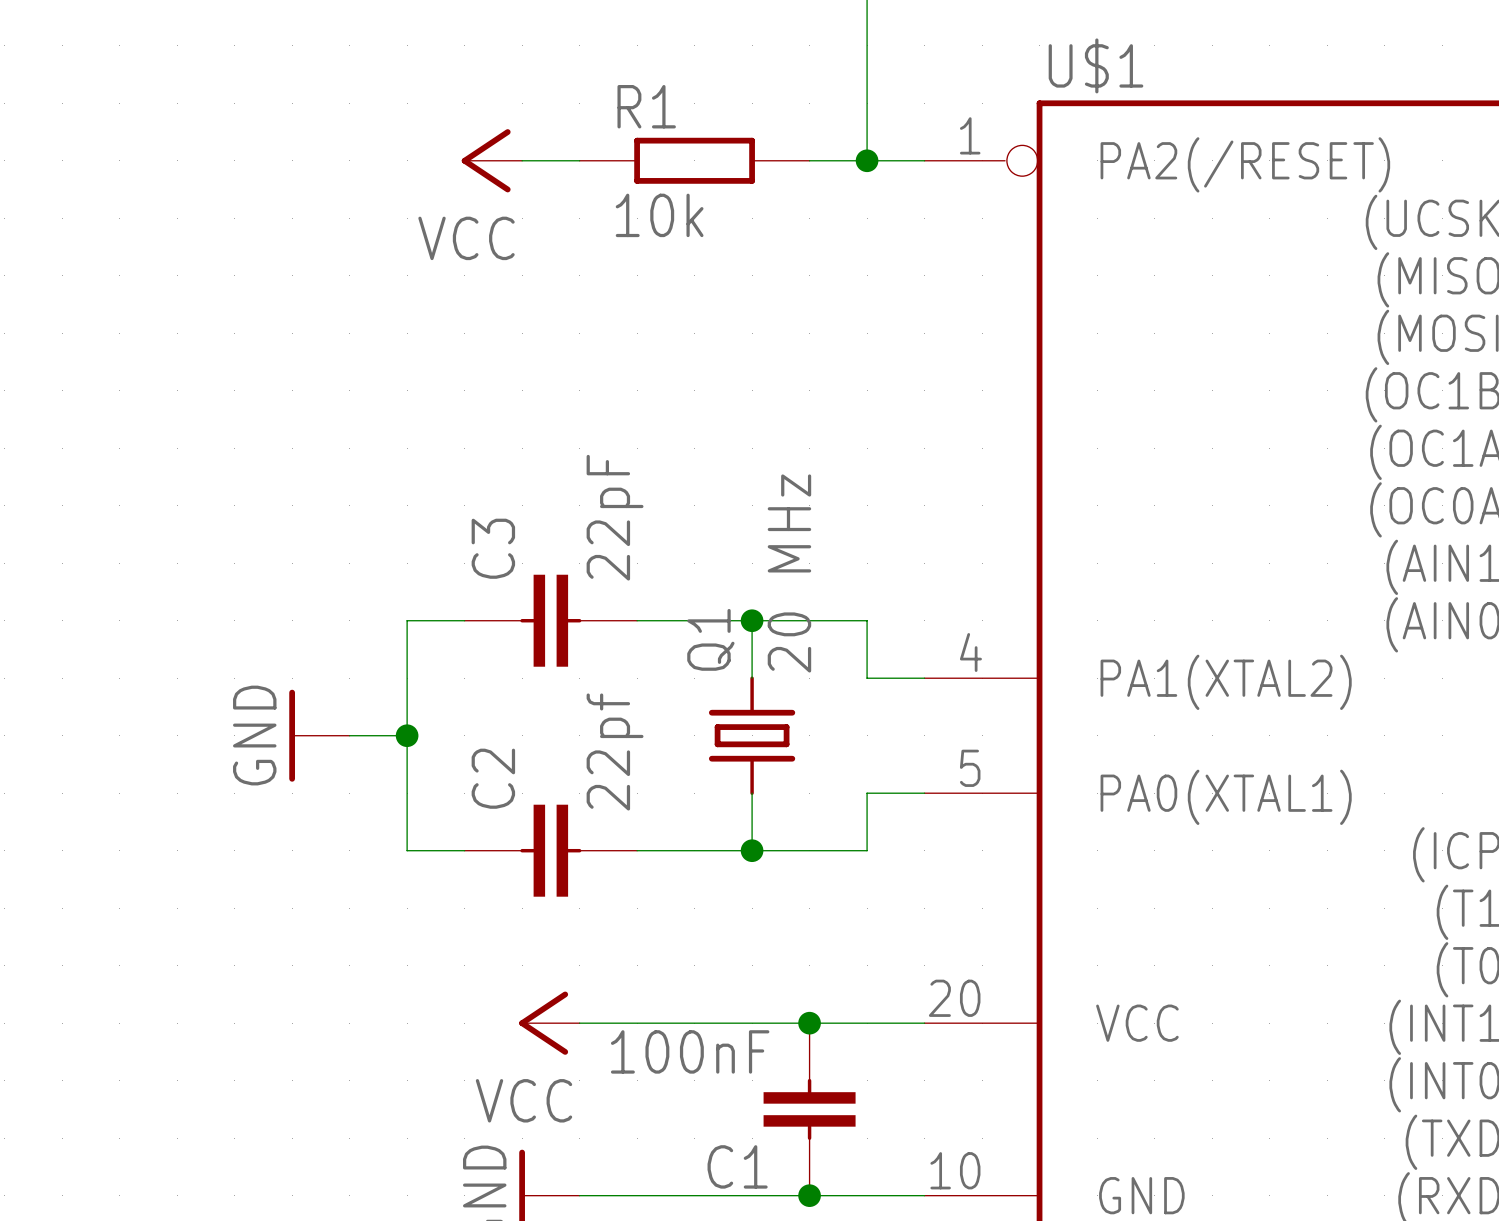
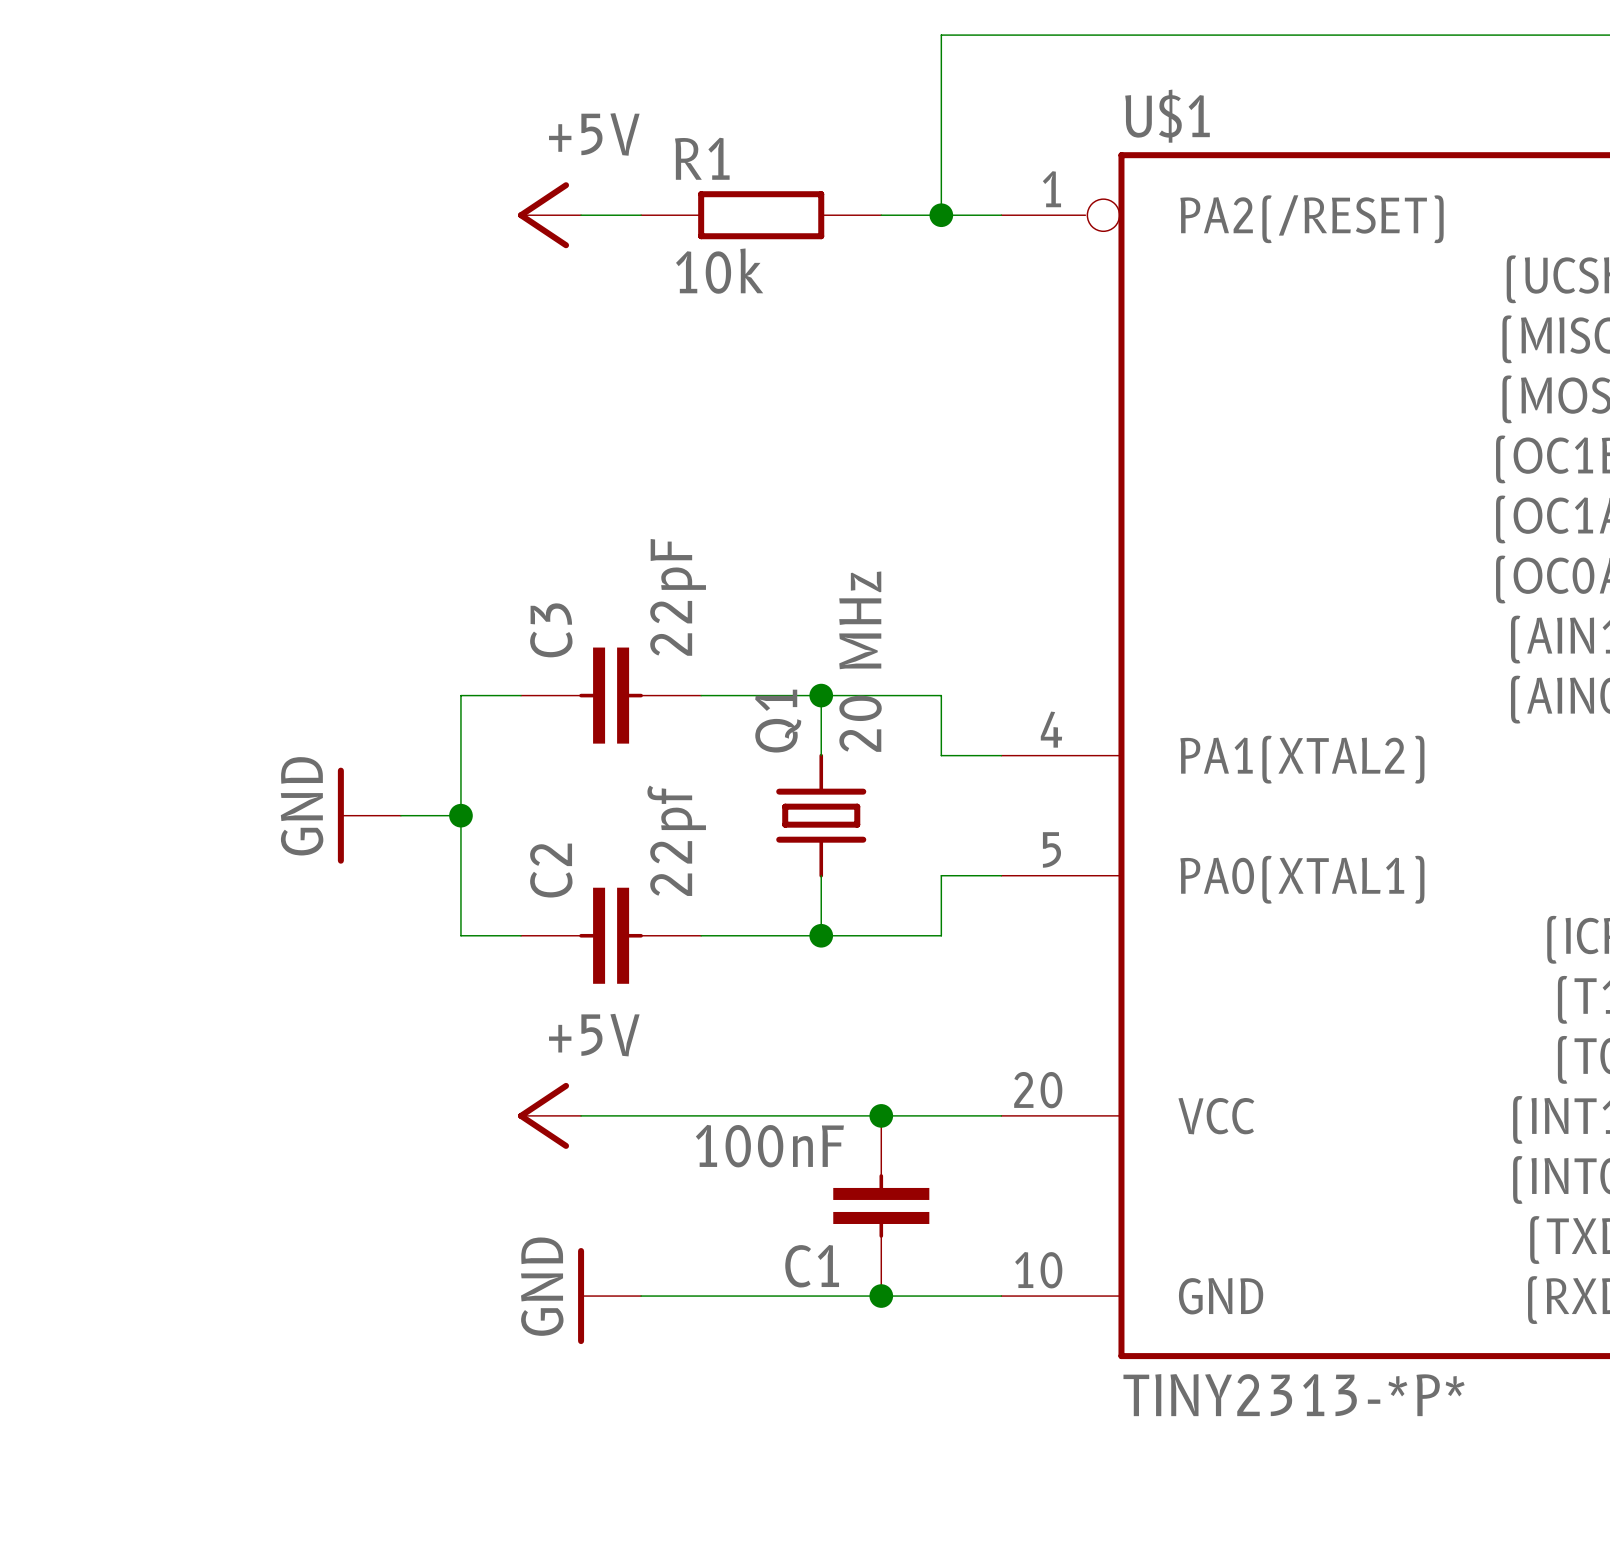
power symbol: VCC (491, 160) -> +5V (549, 215)
power symbol: none -> +5V (549, 1115)
power symbol: VCC (549, 1023) -> none

